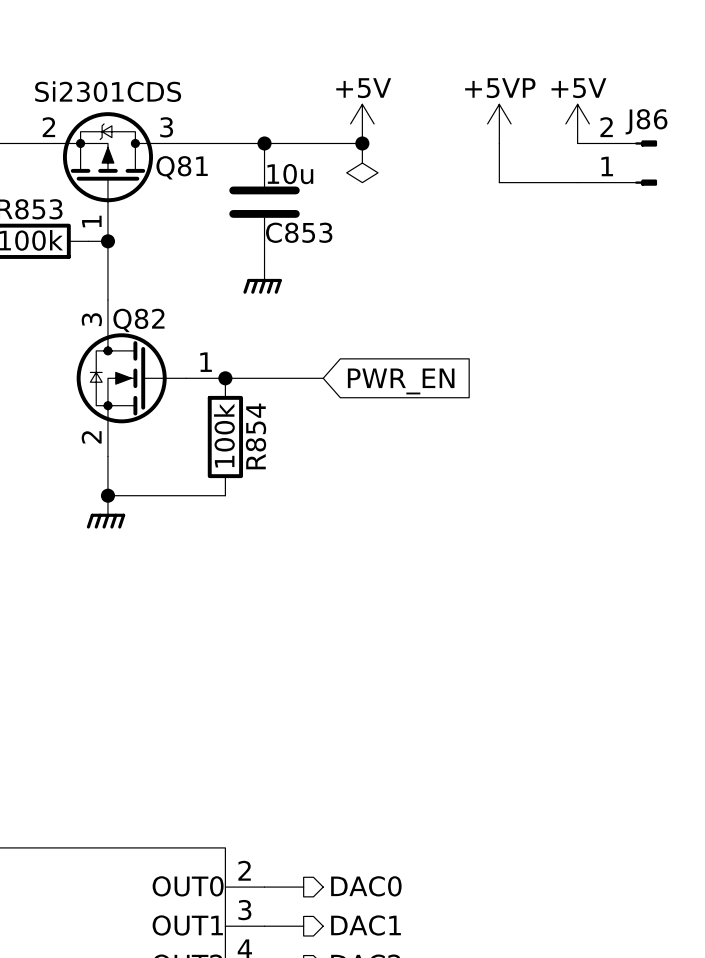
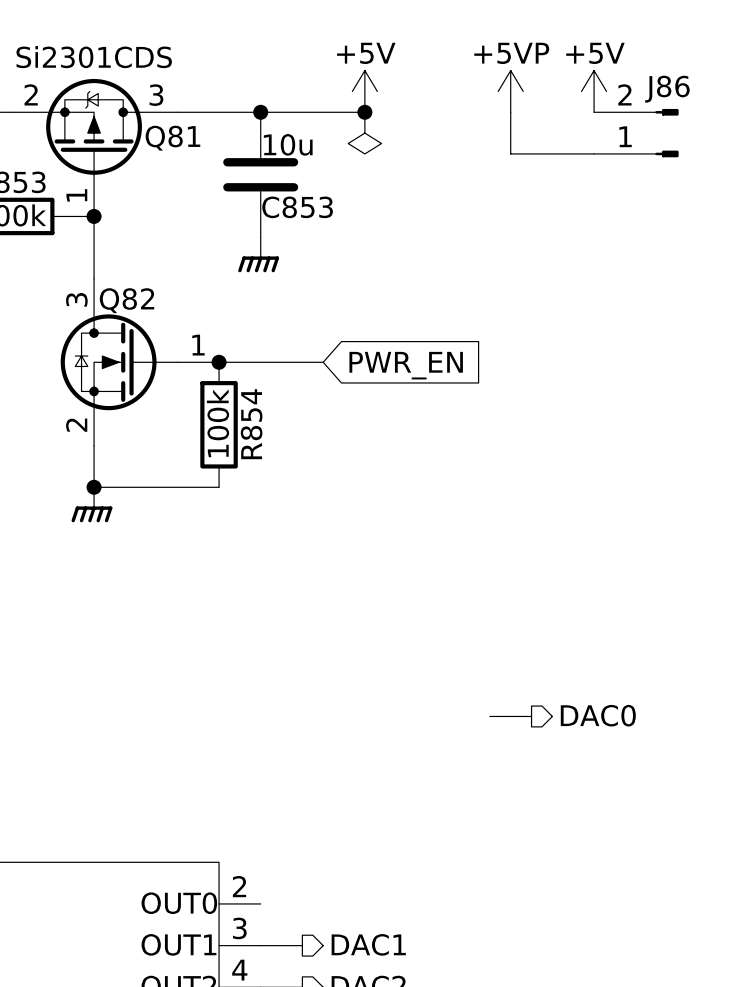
hierarchical label position: DAC0 (366, 886) -> DAC0 (598, 715)
wire: (264, 887) (303, 887) -> (489, 716) (531, 716)

